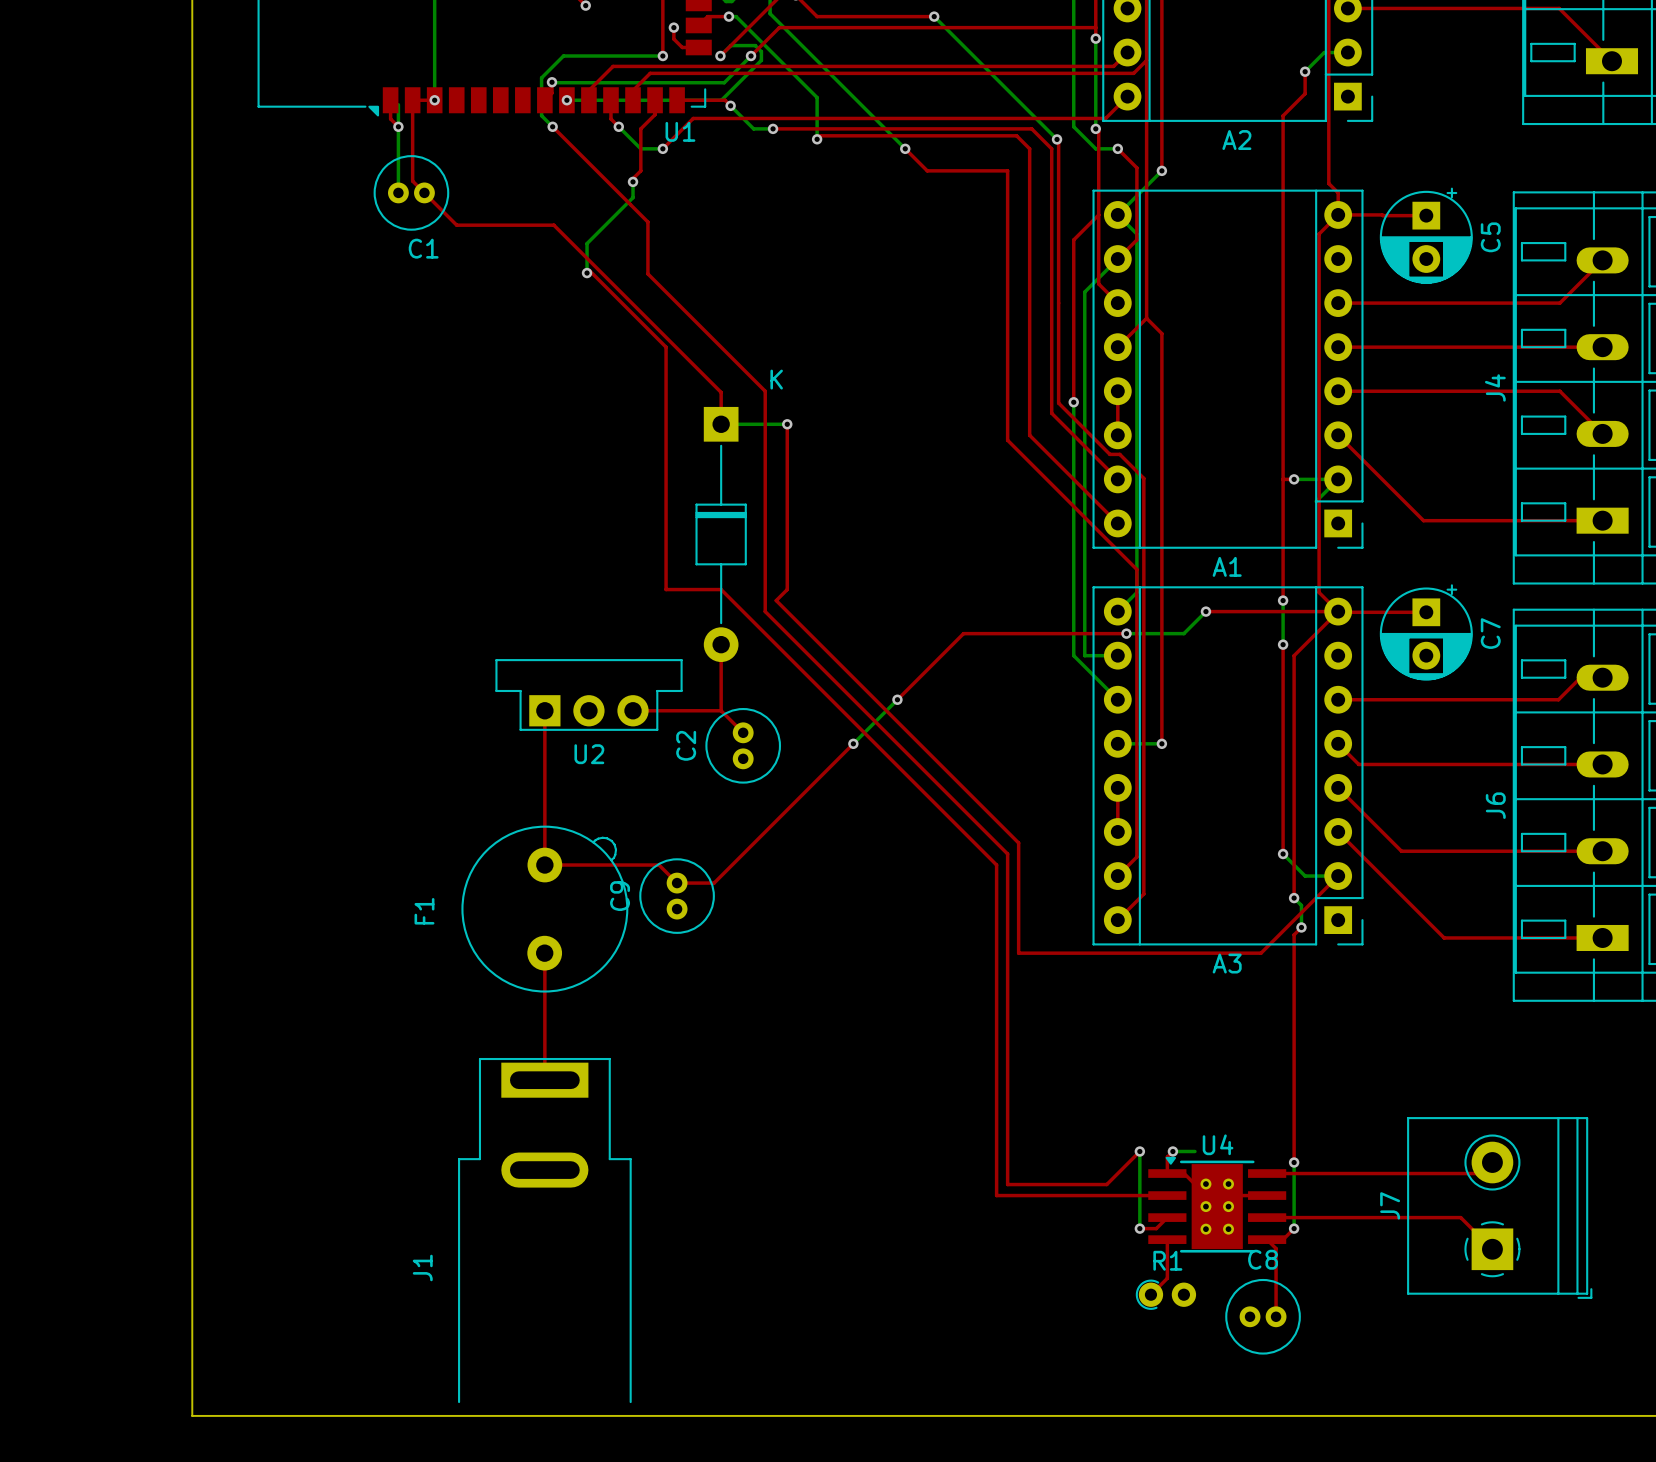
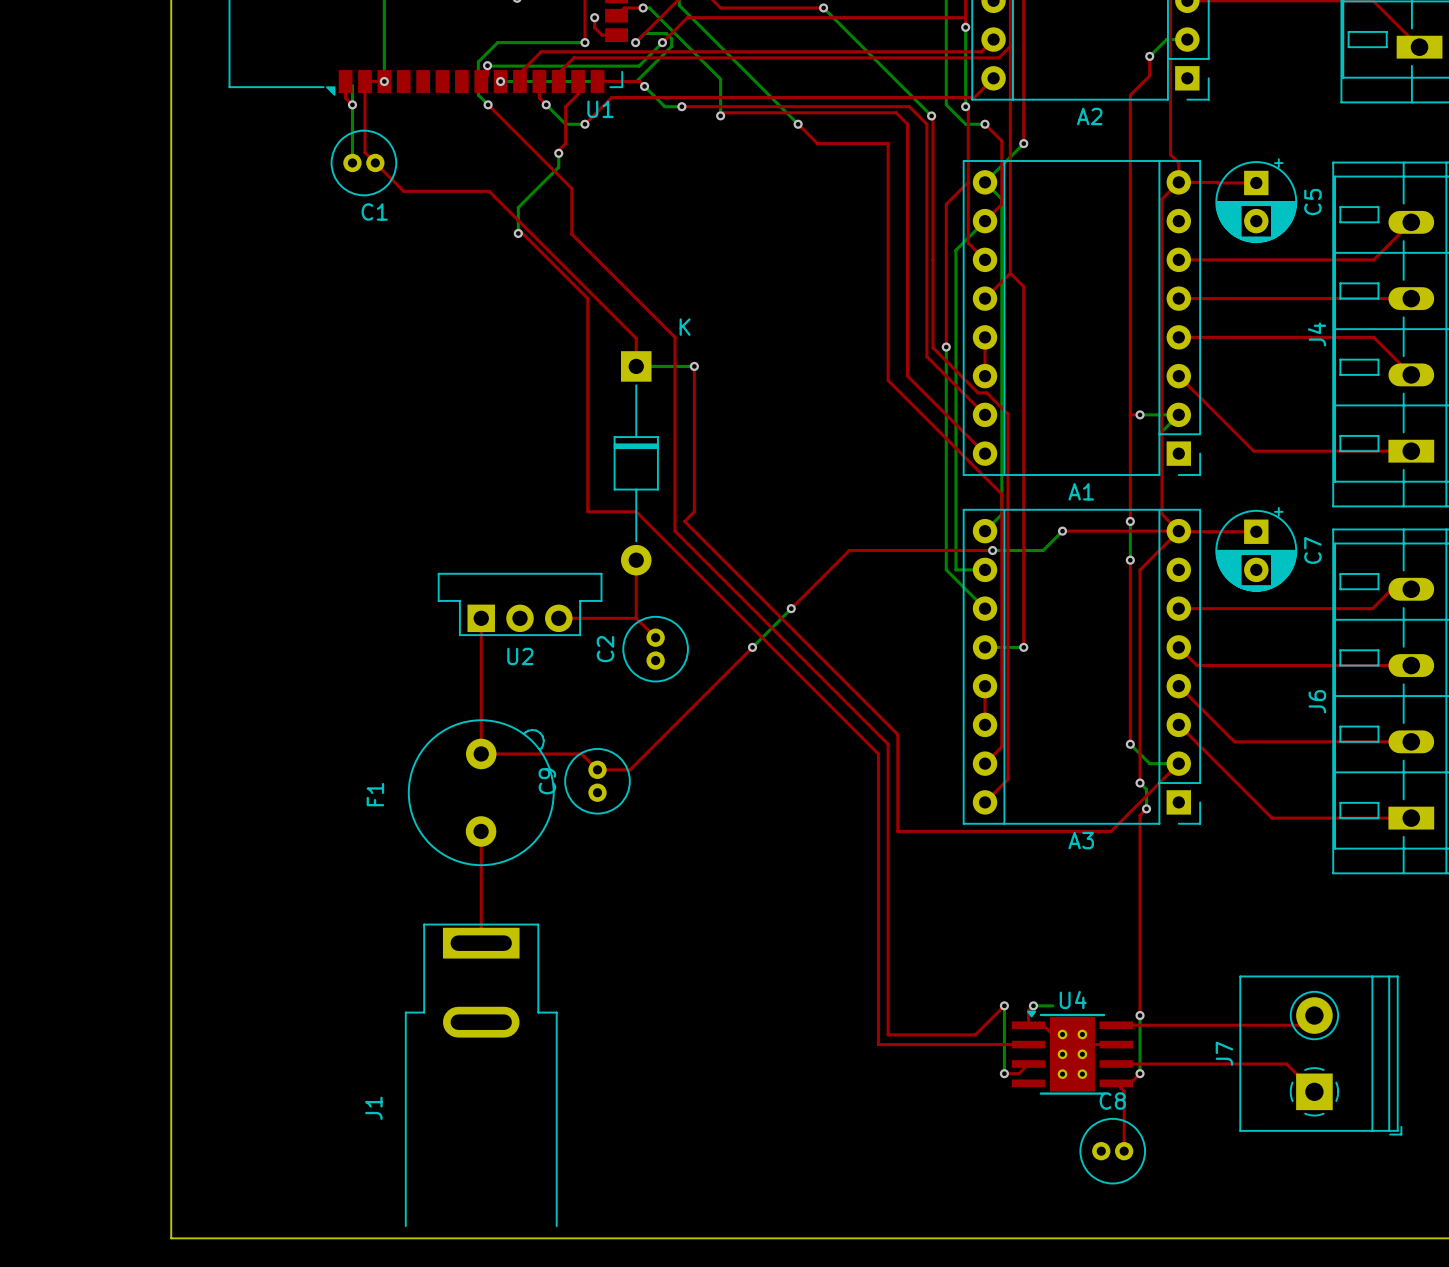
top track: (1167, 1239) (1167, 1278) (1150, 1294) -> none
R1: (1165, 1294) -> none

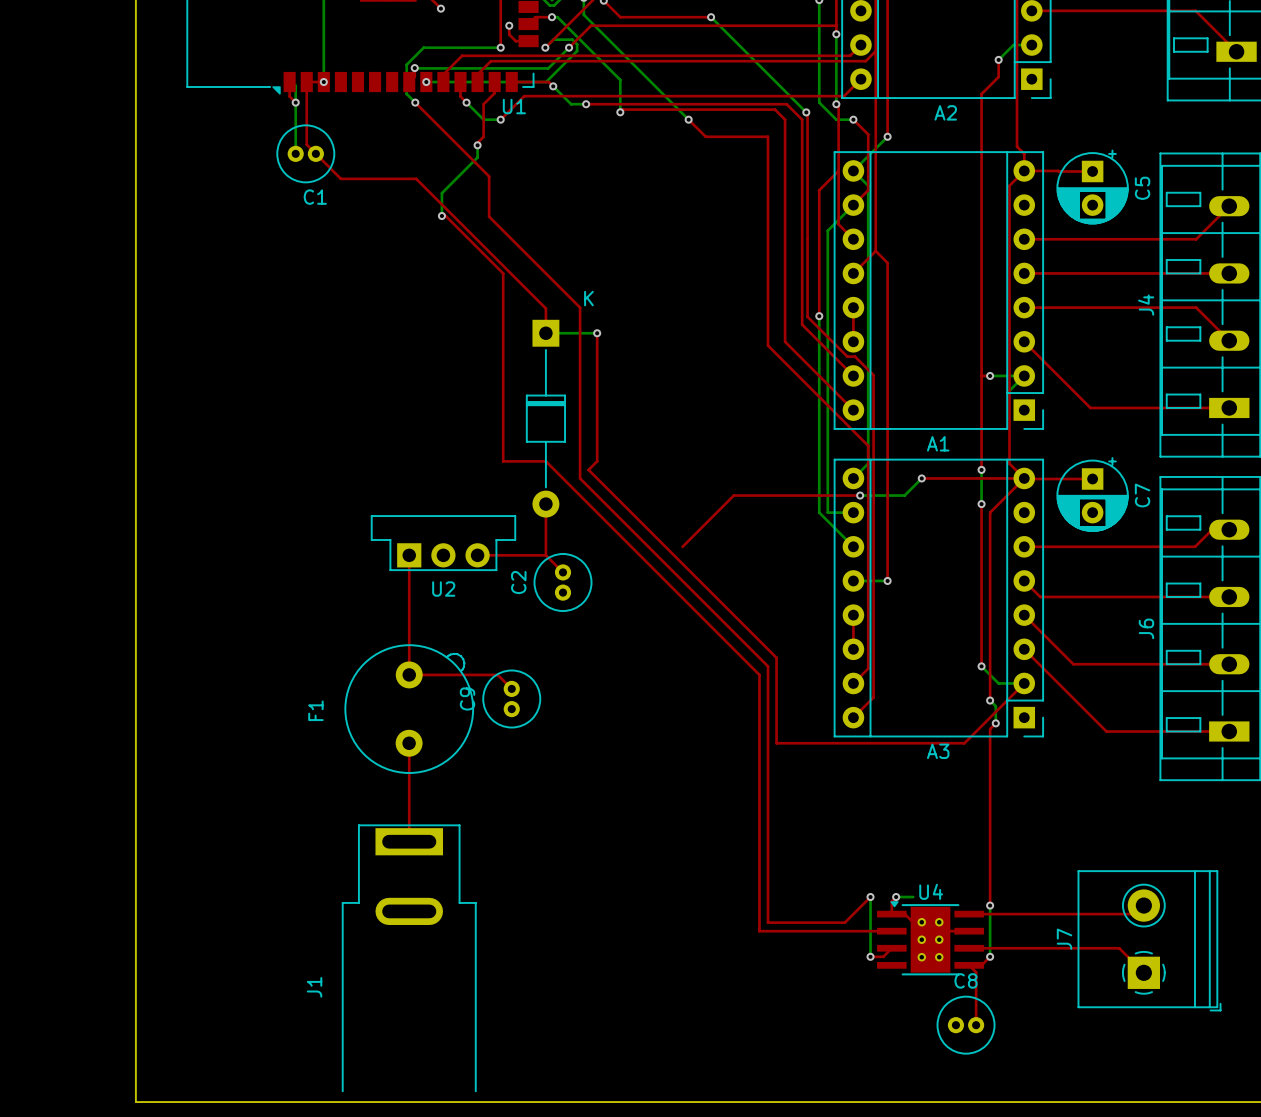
bottom track: (791, 608) (752, 647) -> none
via: (791, 608) -> none
top track: (752, 647) (630, 769) (597, 769) -> none
via: (752, 647) -> none

